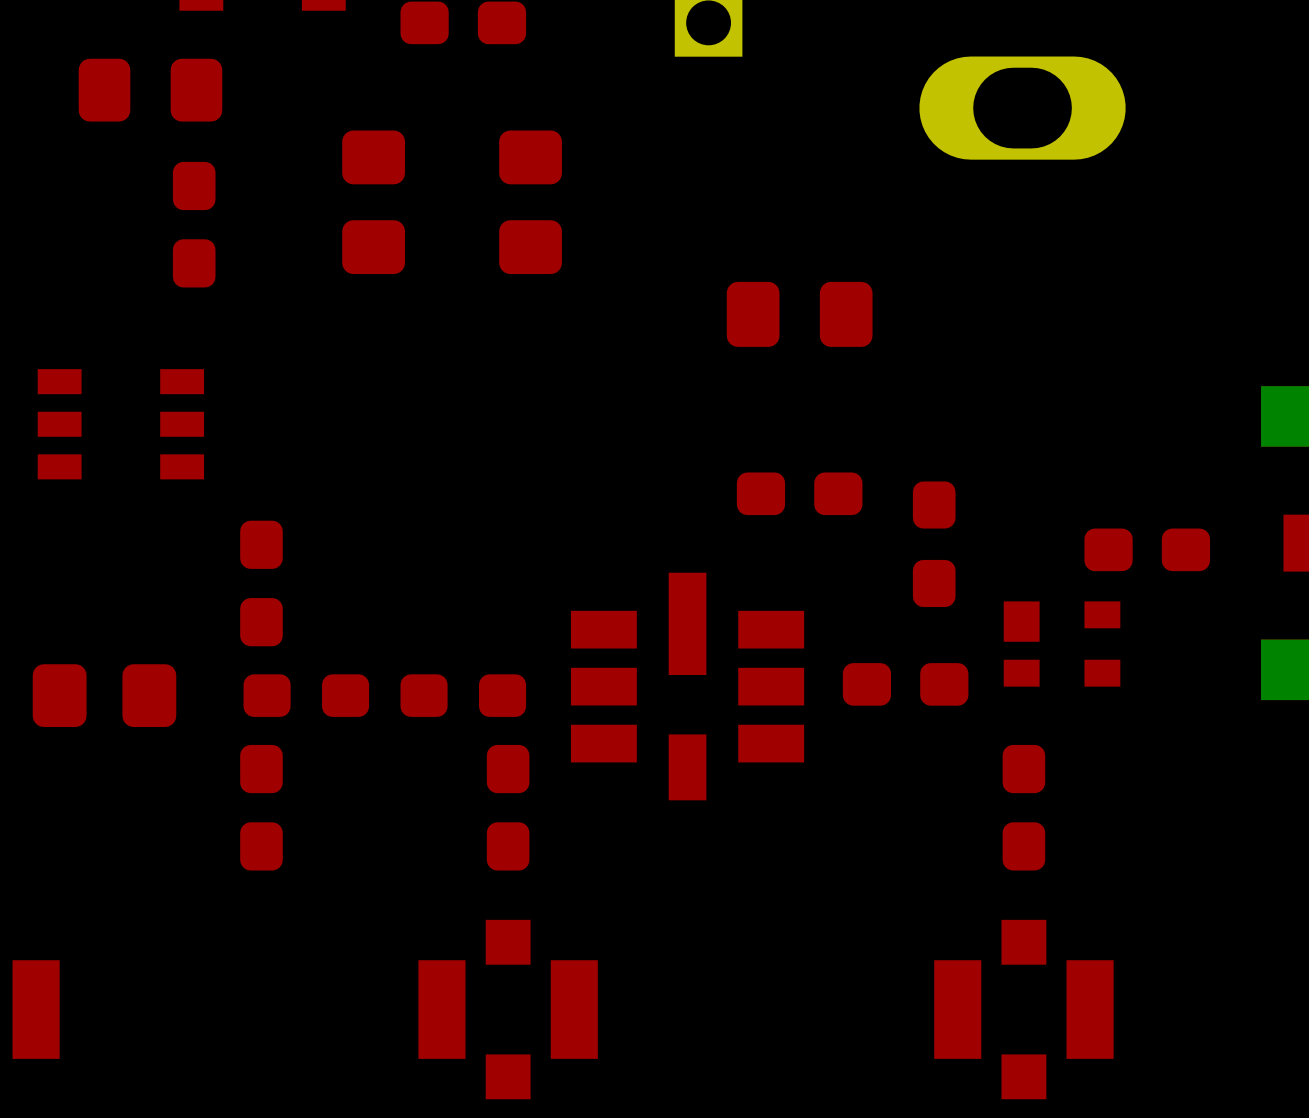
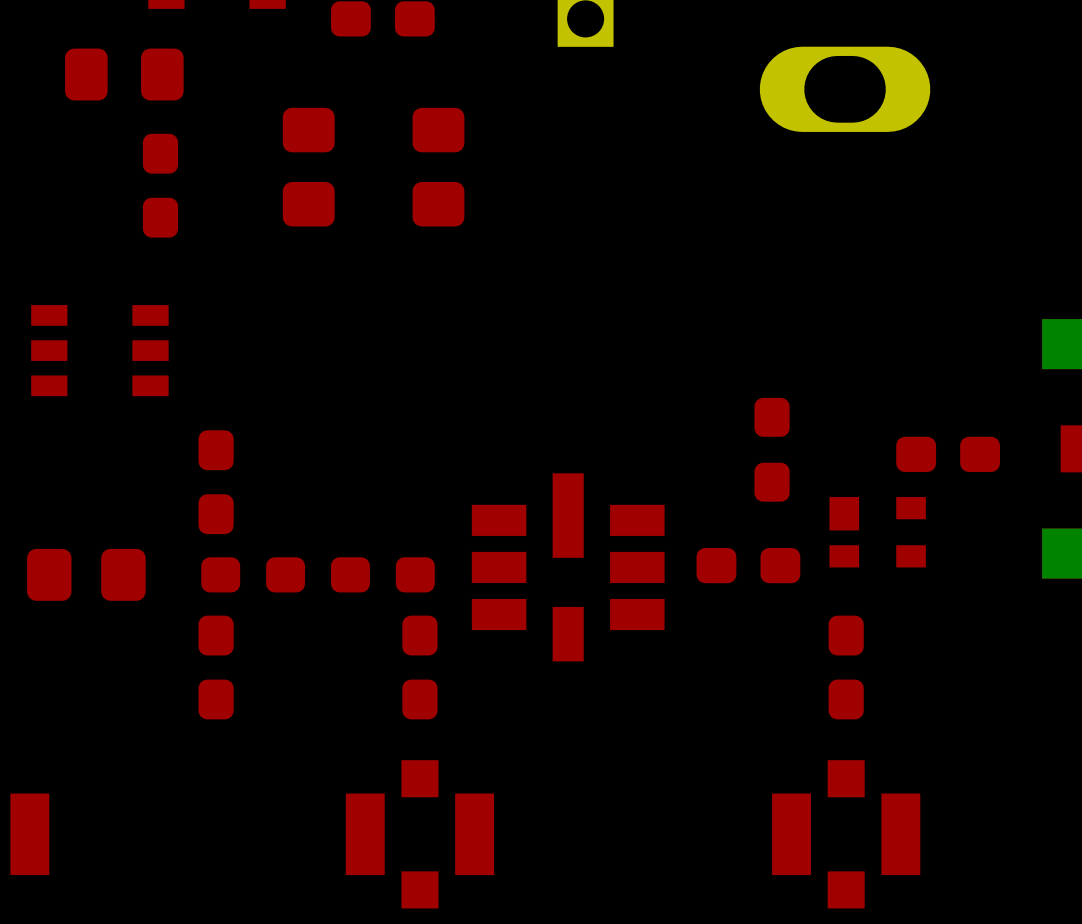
part: (799, 314) -> none
part: (799, 493) -> none

